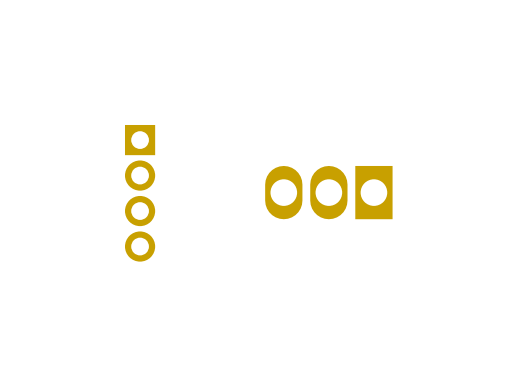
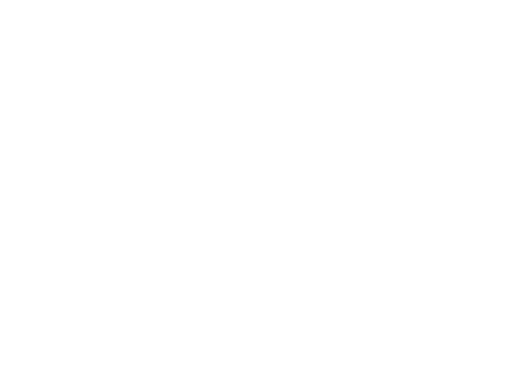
part: (328, 192) -> none
part: (140, 193) -> none

